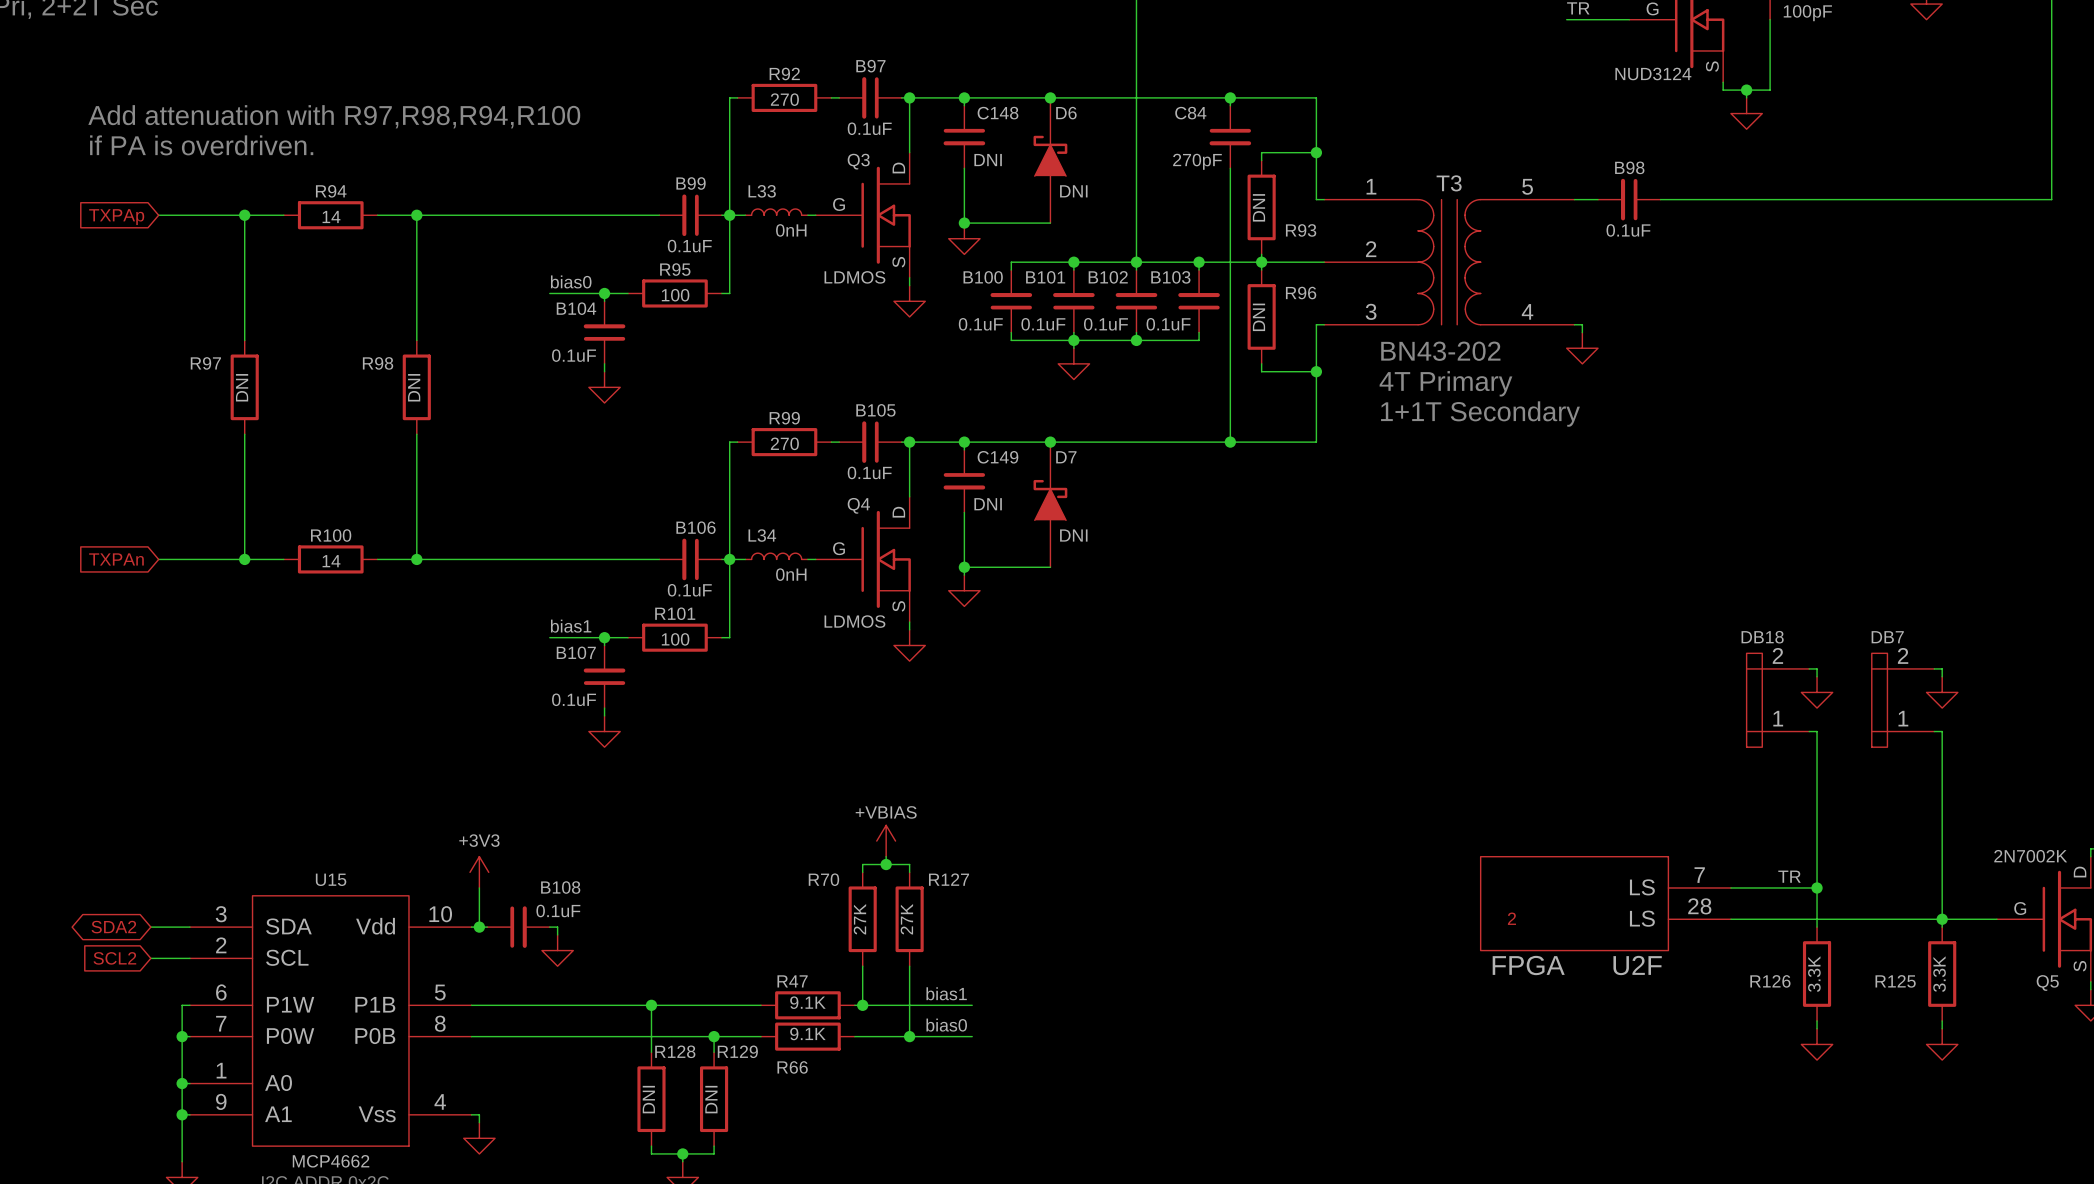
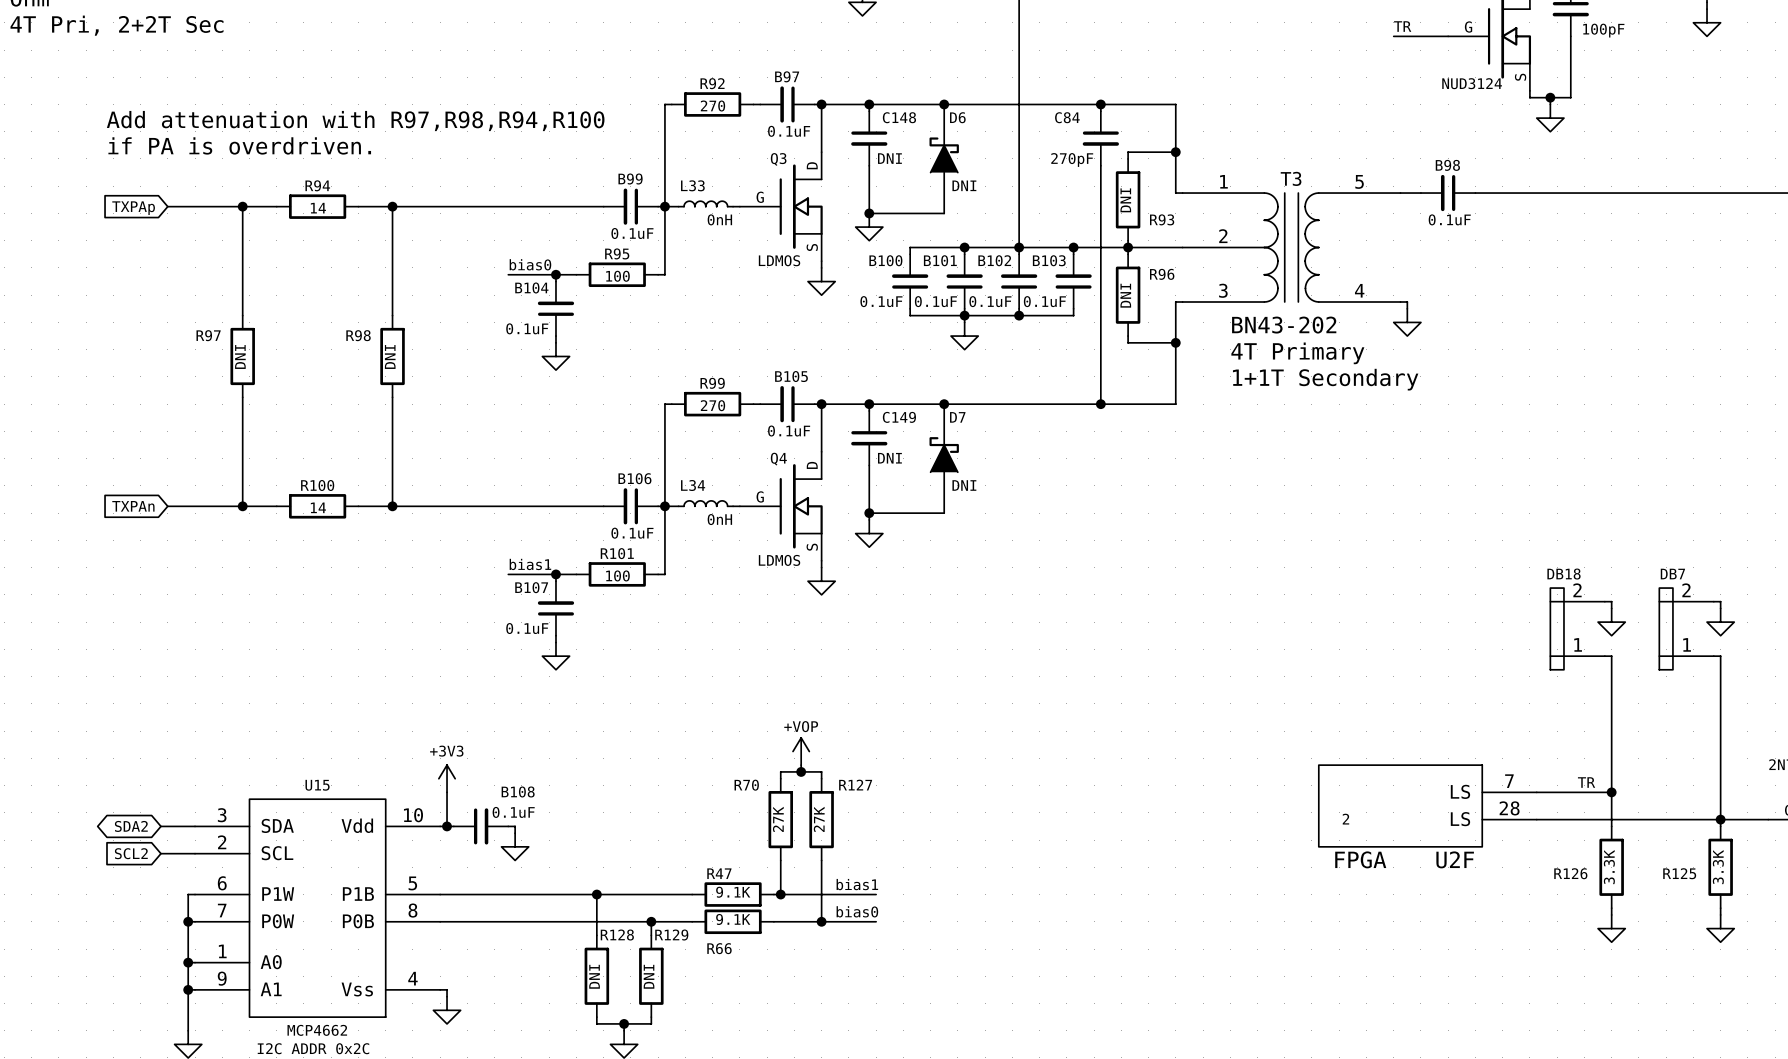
power symbol: +VBIAS (886, 841) -> +VOP (801, 751)

